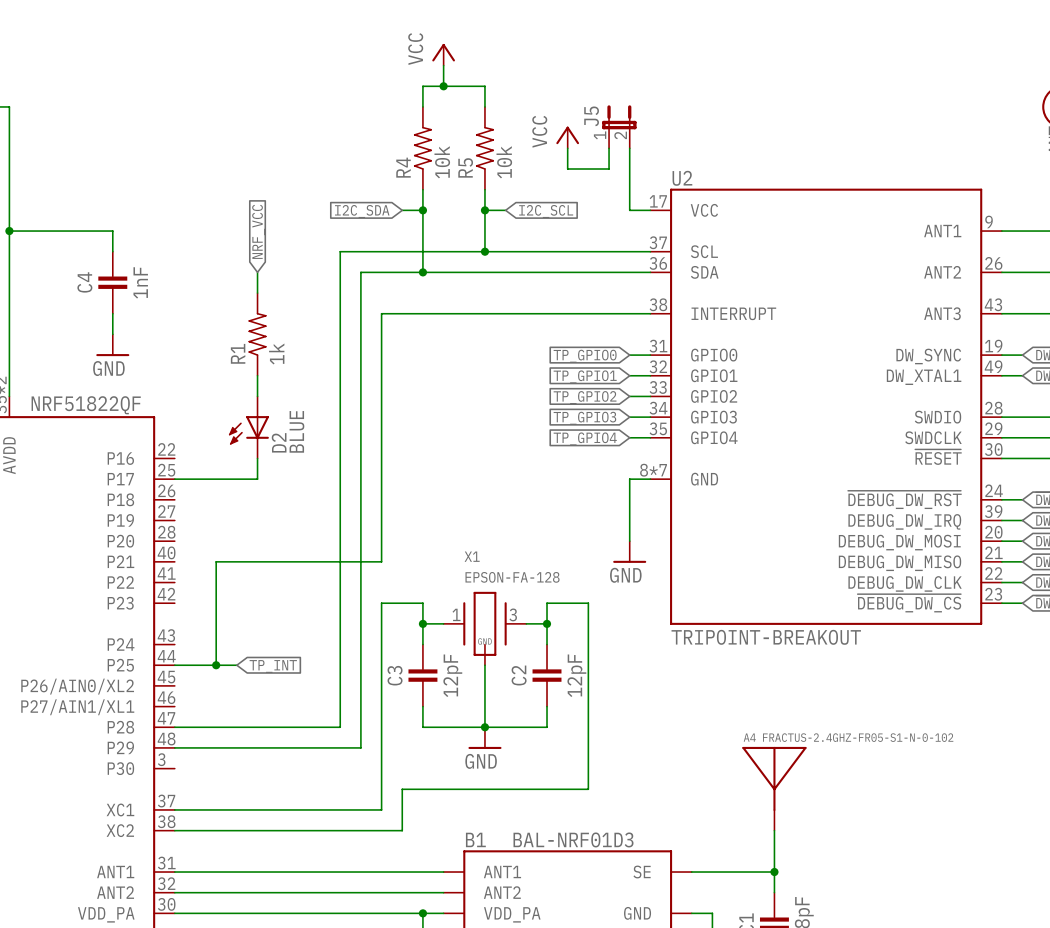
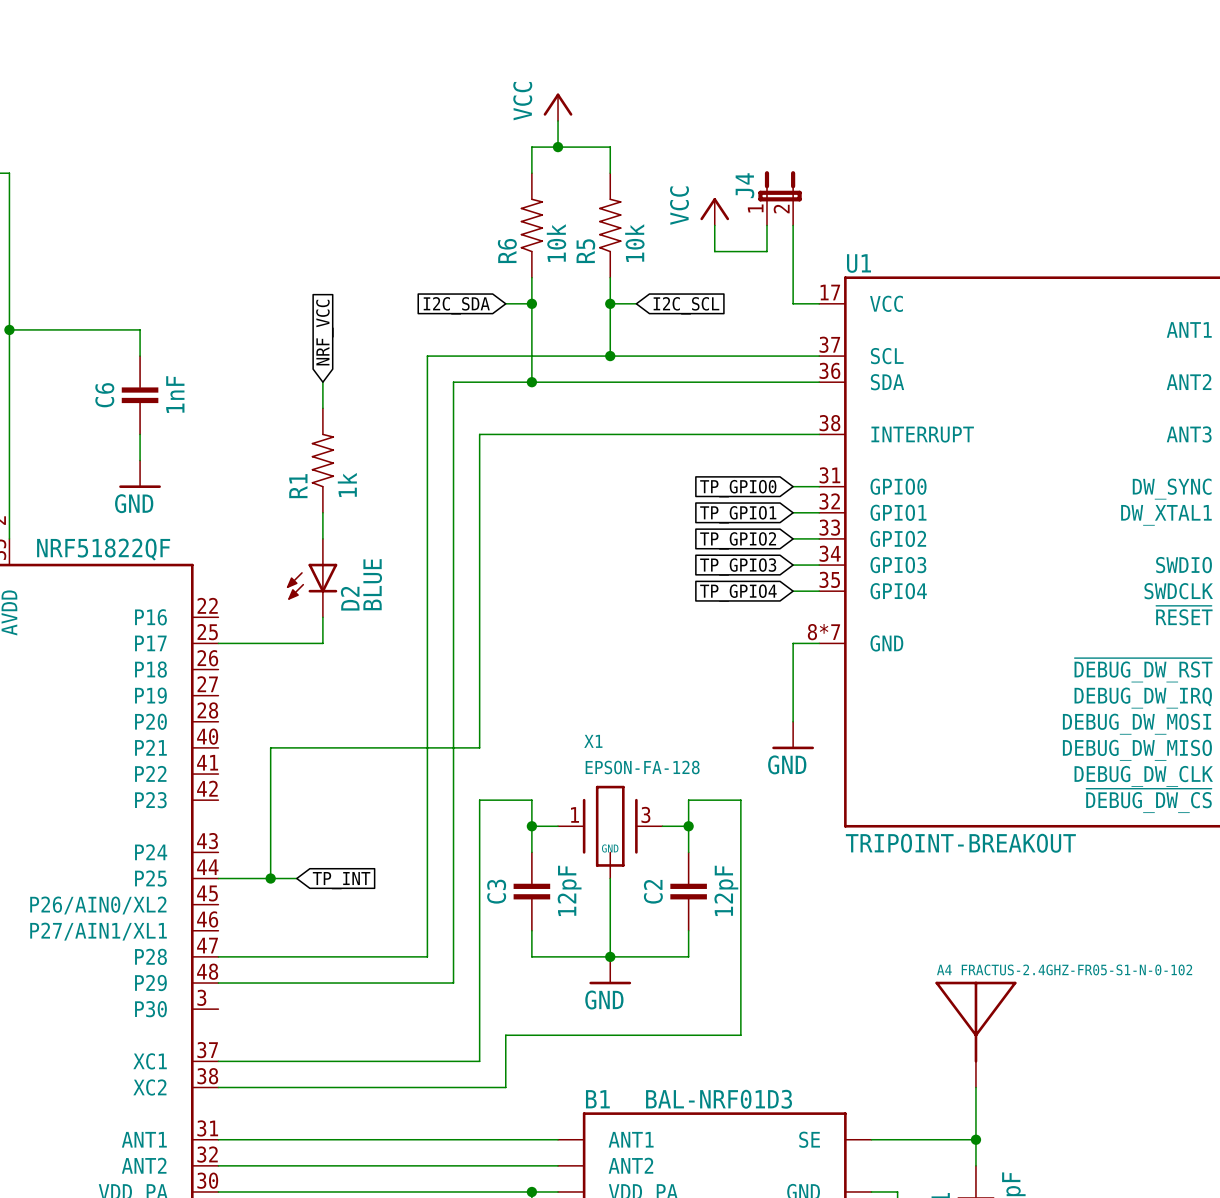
J5 name: J5 (591, 116) -> J4 (744, 185)
R4 name: R4 (403, 167) -> R6 (507, 250)
U2 name: U2 (682, 178) -> U1 (858, 263)
C4 name: C4 (84, 282) -> C6 (104, 395)

